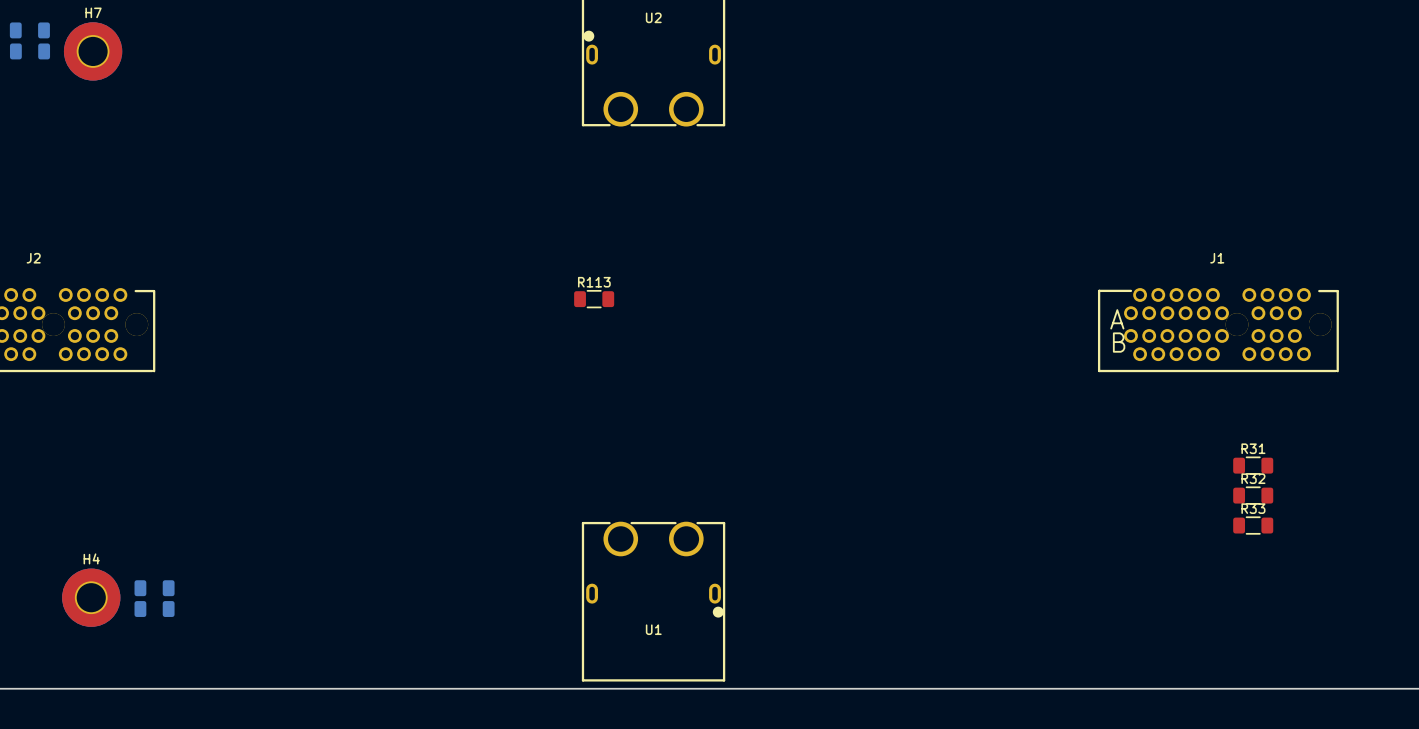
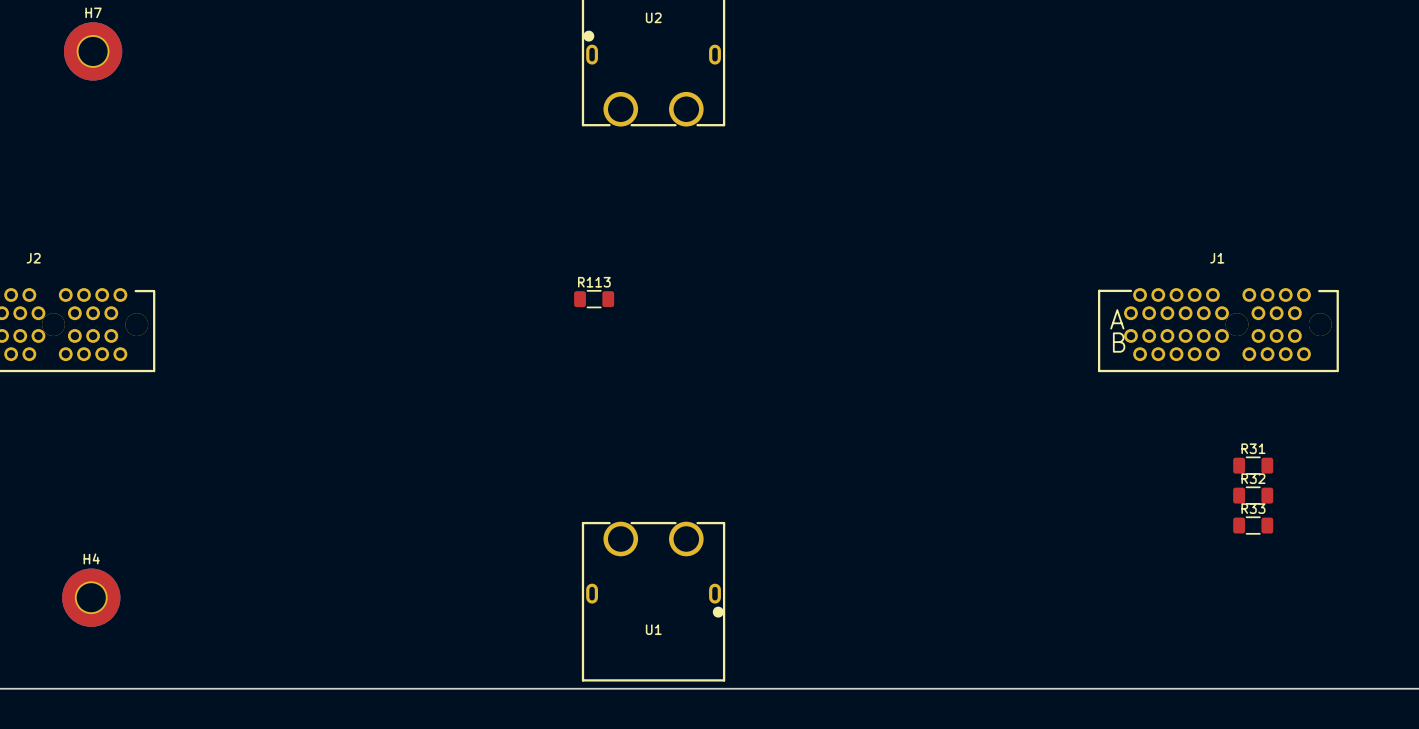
part: (29, 30) -> none
part: (30, 51) -> none
part: (154, 588) -> none
part: (154, 609) -> none

